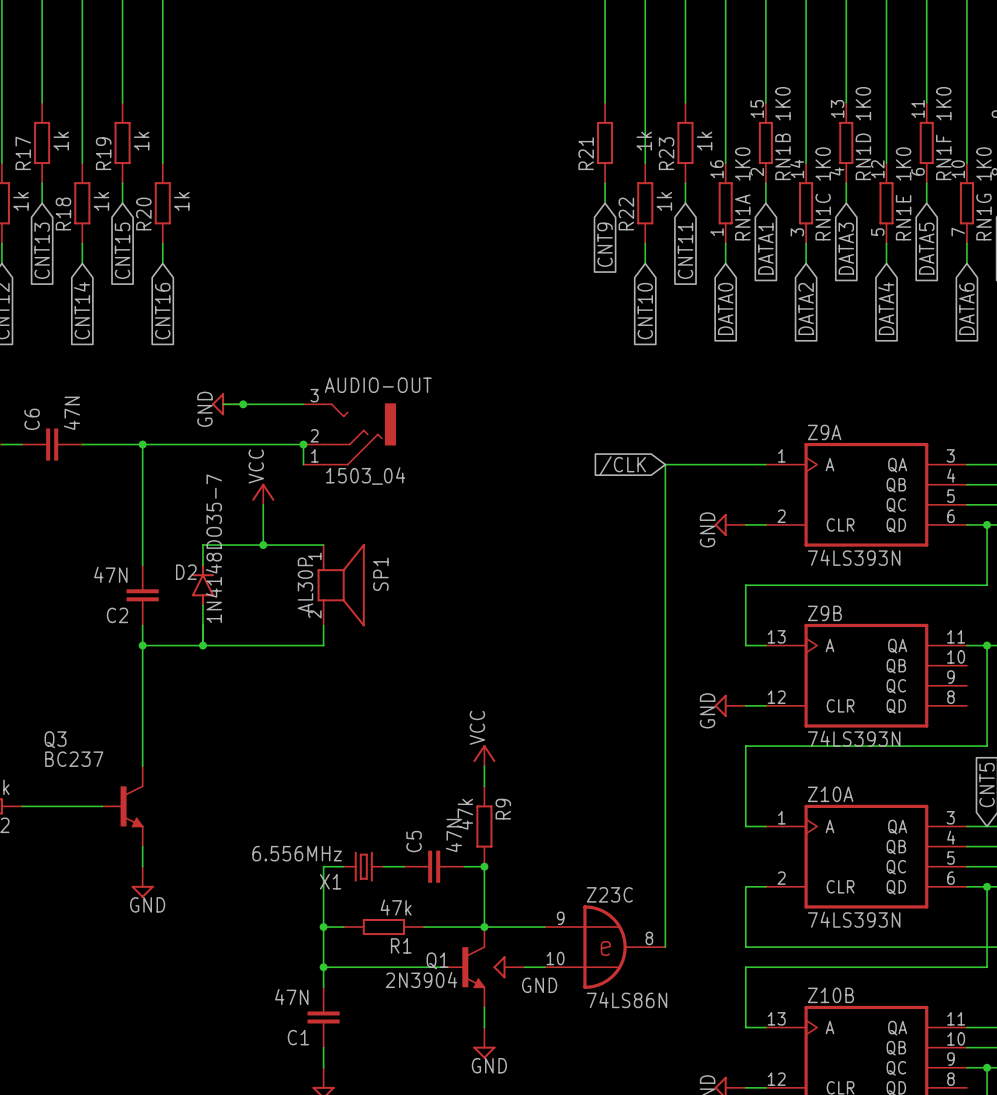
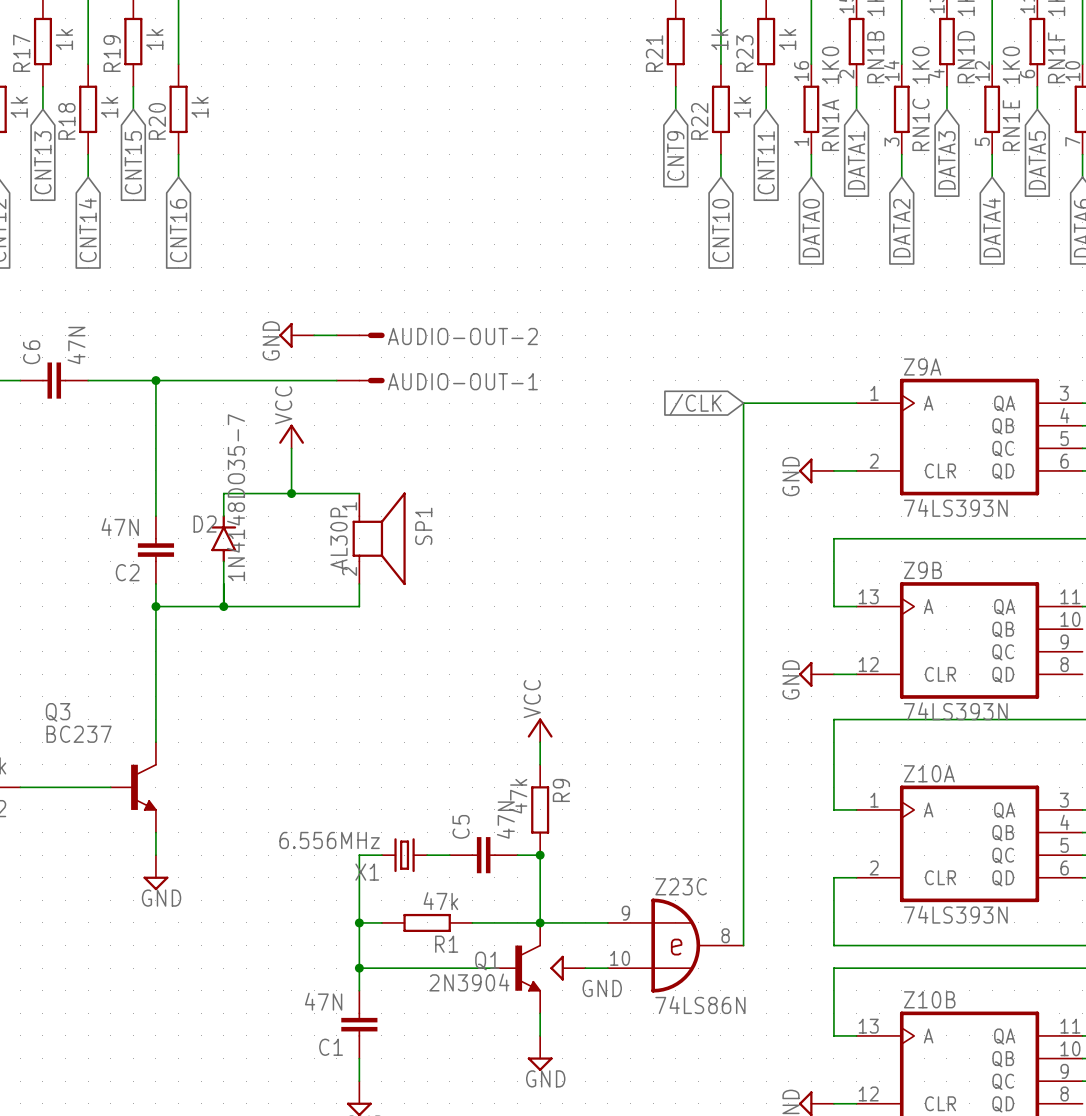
wire: (223, 404) (283, 404) -> none
power symbol position: GND (227, 404) -> GND (296, 335)
junction: (243, 404) -> none
AUDIO-OUT-2: none -> (360, 335)
AUDIO-OUT: 1503_04 (349, 434) -> none
wire: (303, 444) (303, 464) -> none
junction: (303, 444) -> none
AUDIO-OUT-1: none -> (360, 380)

